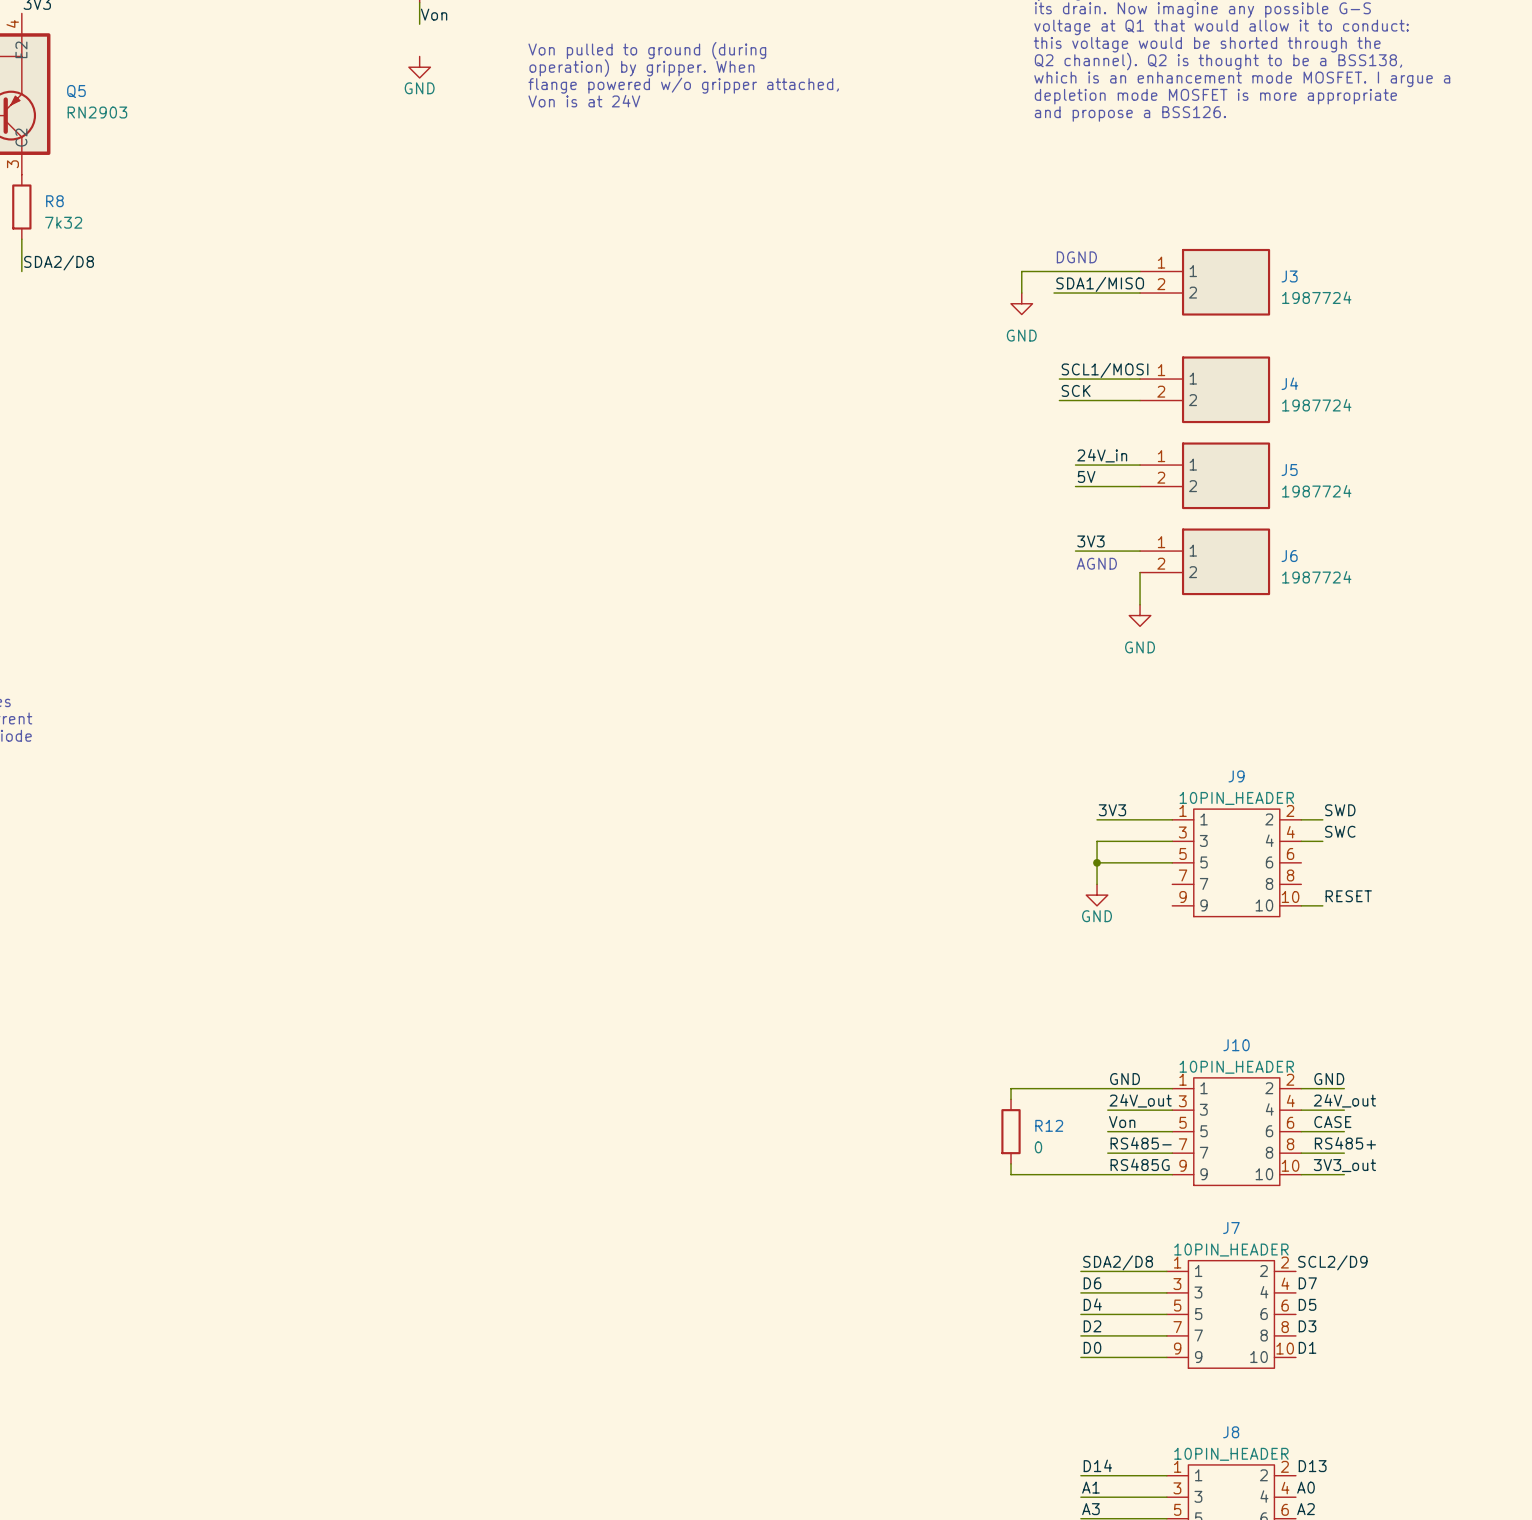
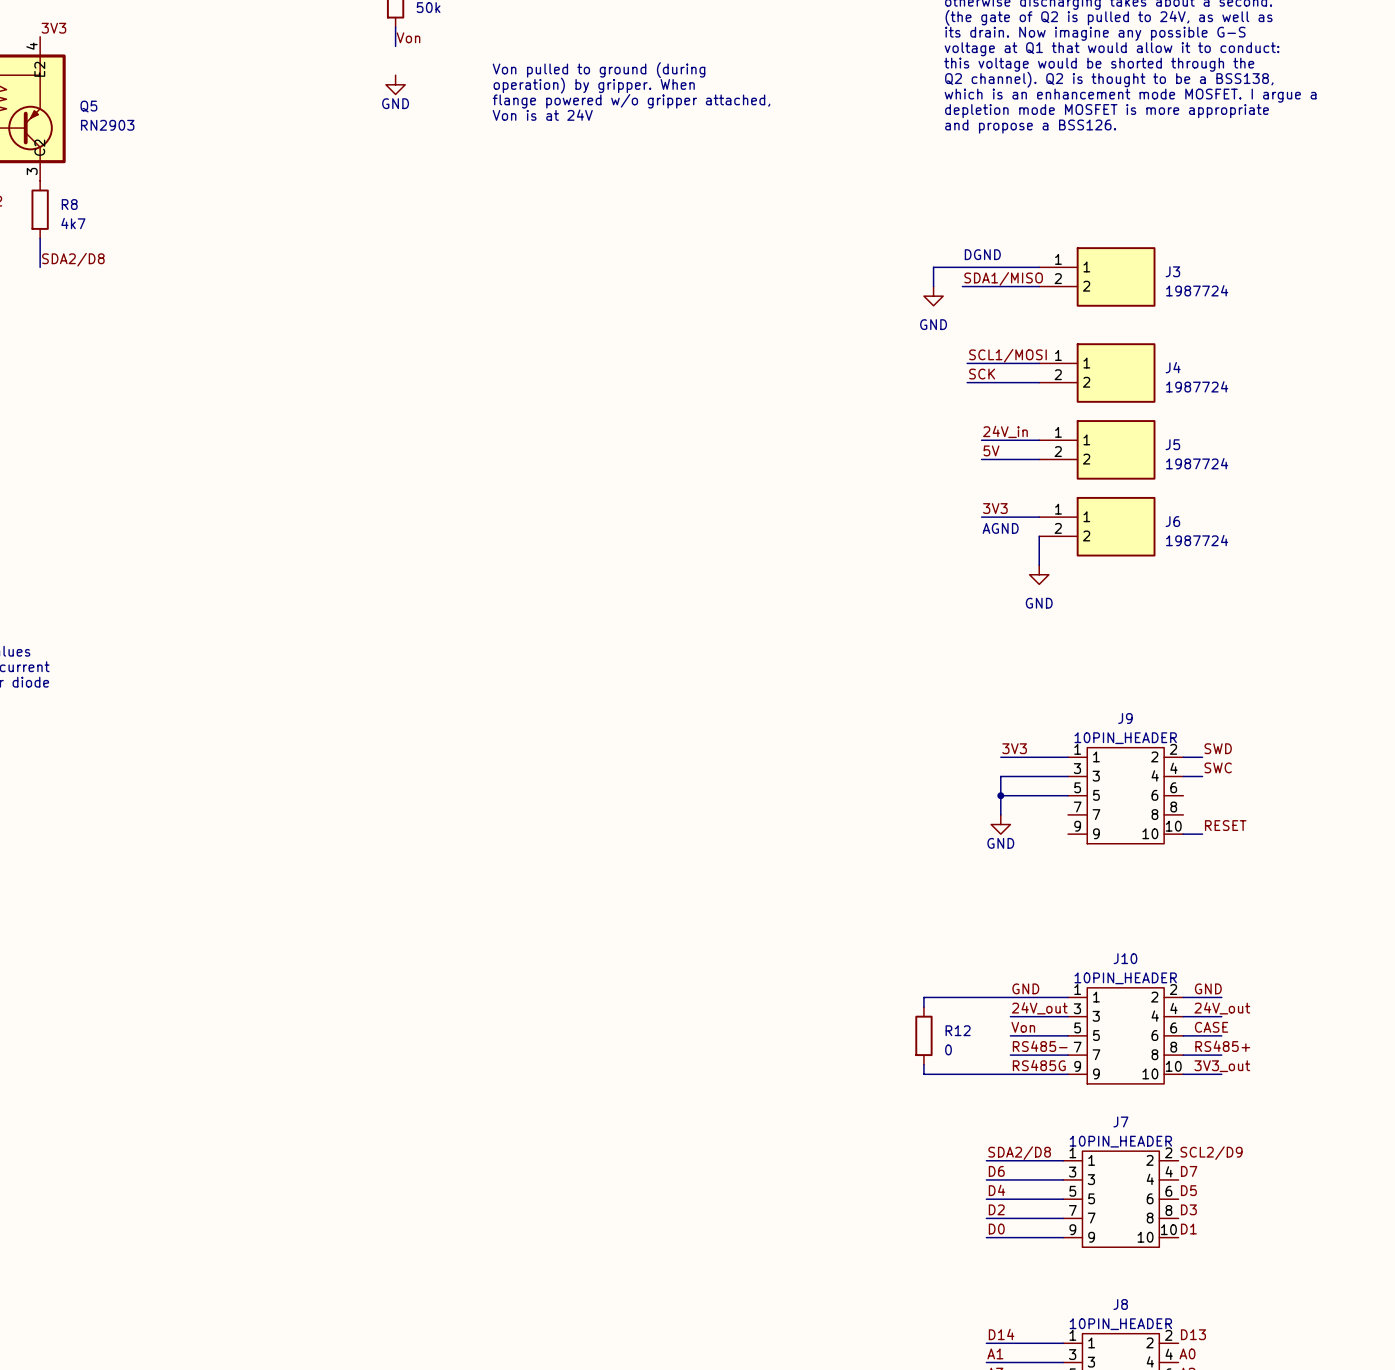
R8 value: 7k32 (63, 222) -> 4k7 (73, 223)

